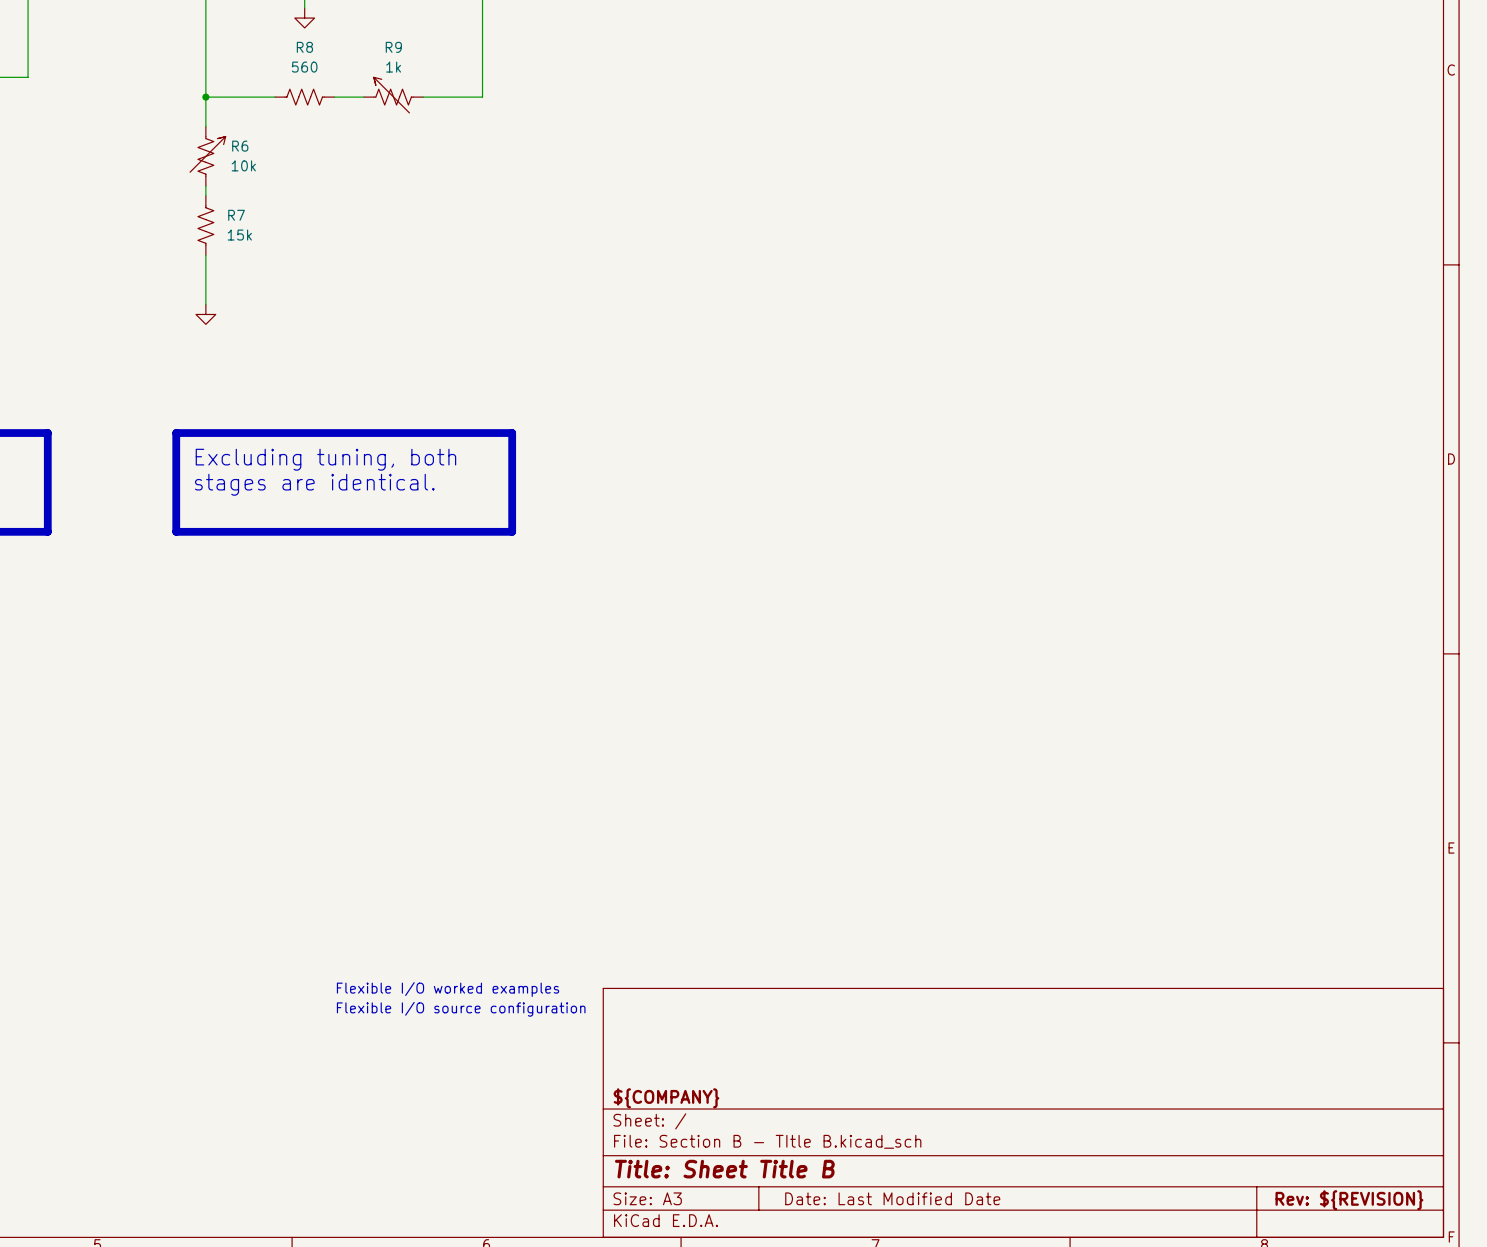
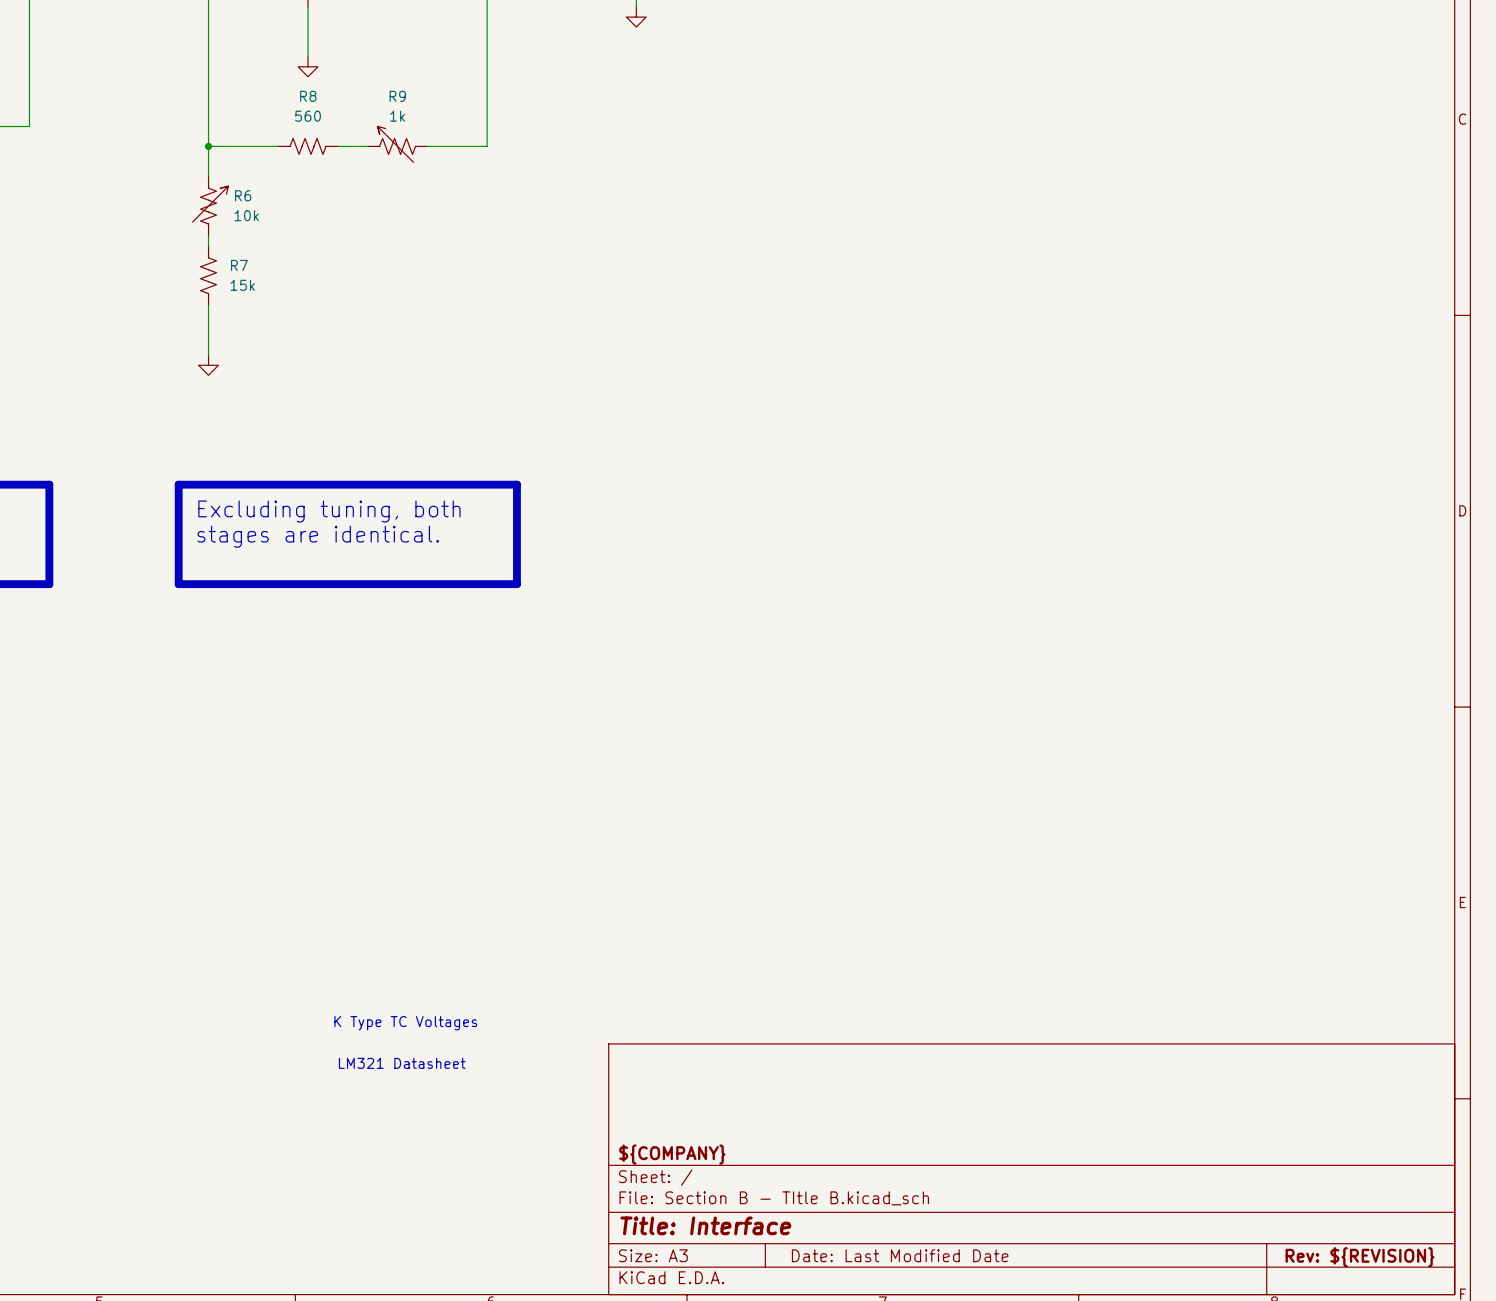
text: none -> K Type TC Voltages (405, 1023)
text: Flexible I/O worked examples (448, 989) -> none
text: none -> LM321 Datasheet (402, 1063)
text: Flexible I/O source configuration (461, 1009) -> none
title block: Title: Sheet Title B (724, 1169) -> Title: Interface (705, 1225)

